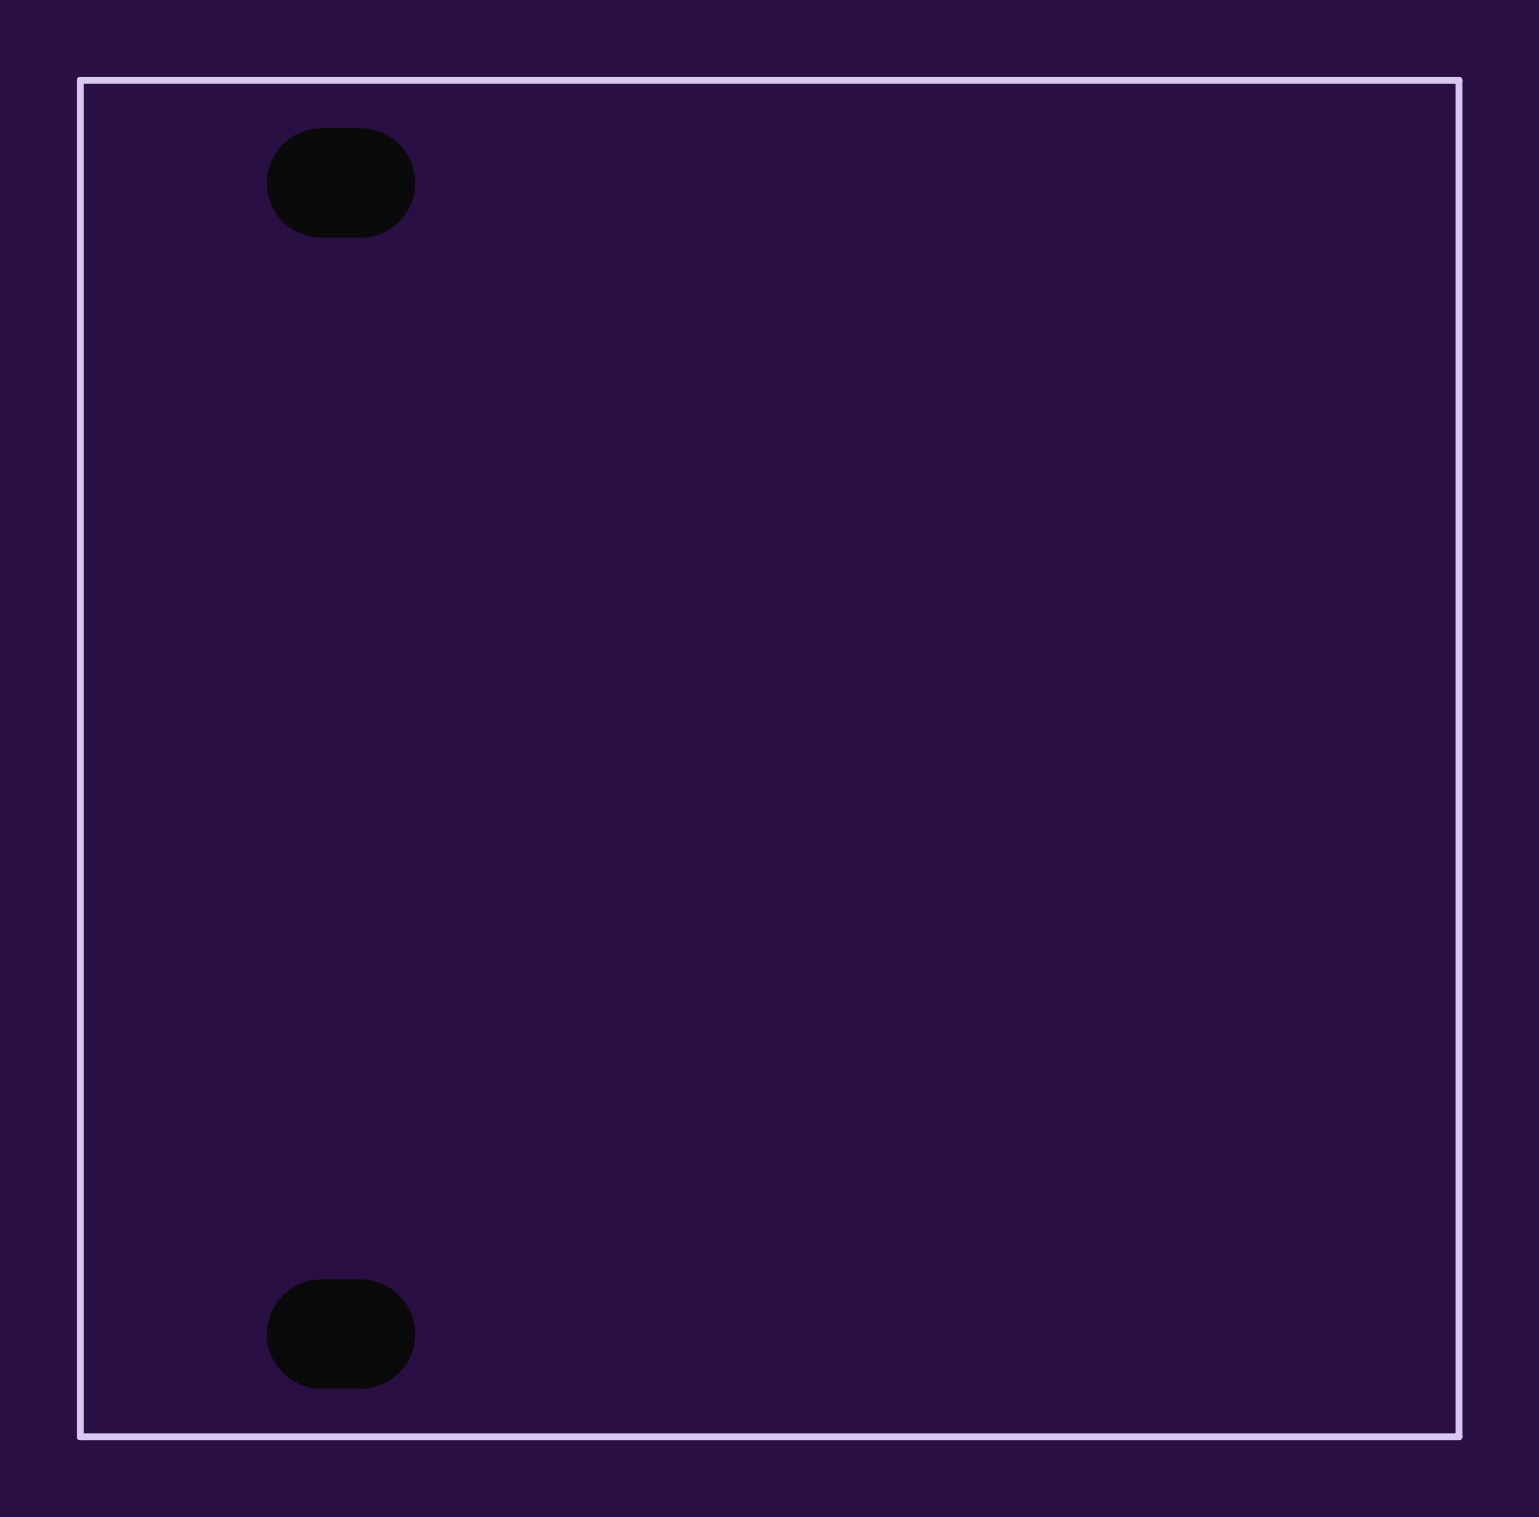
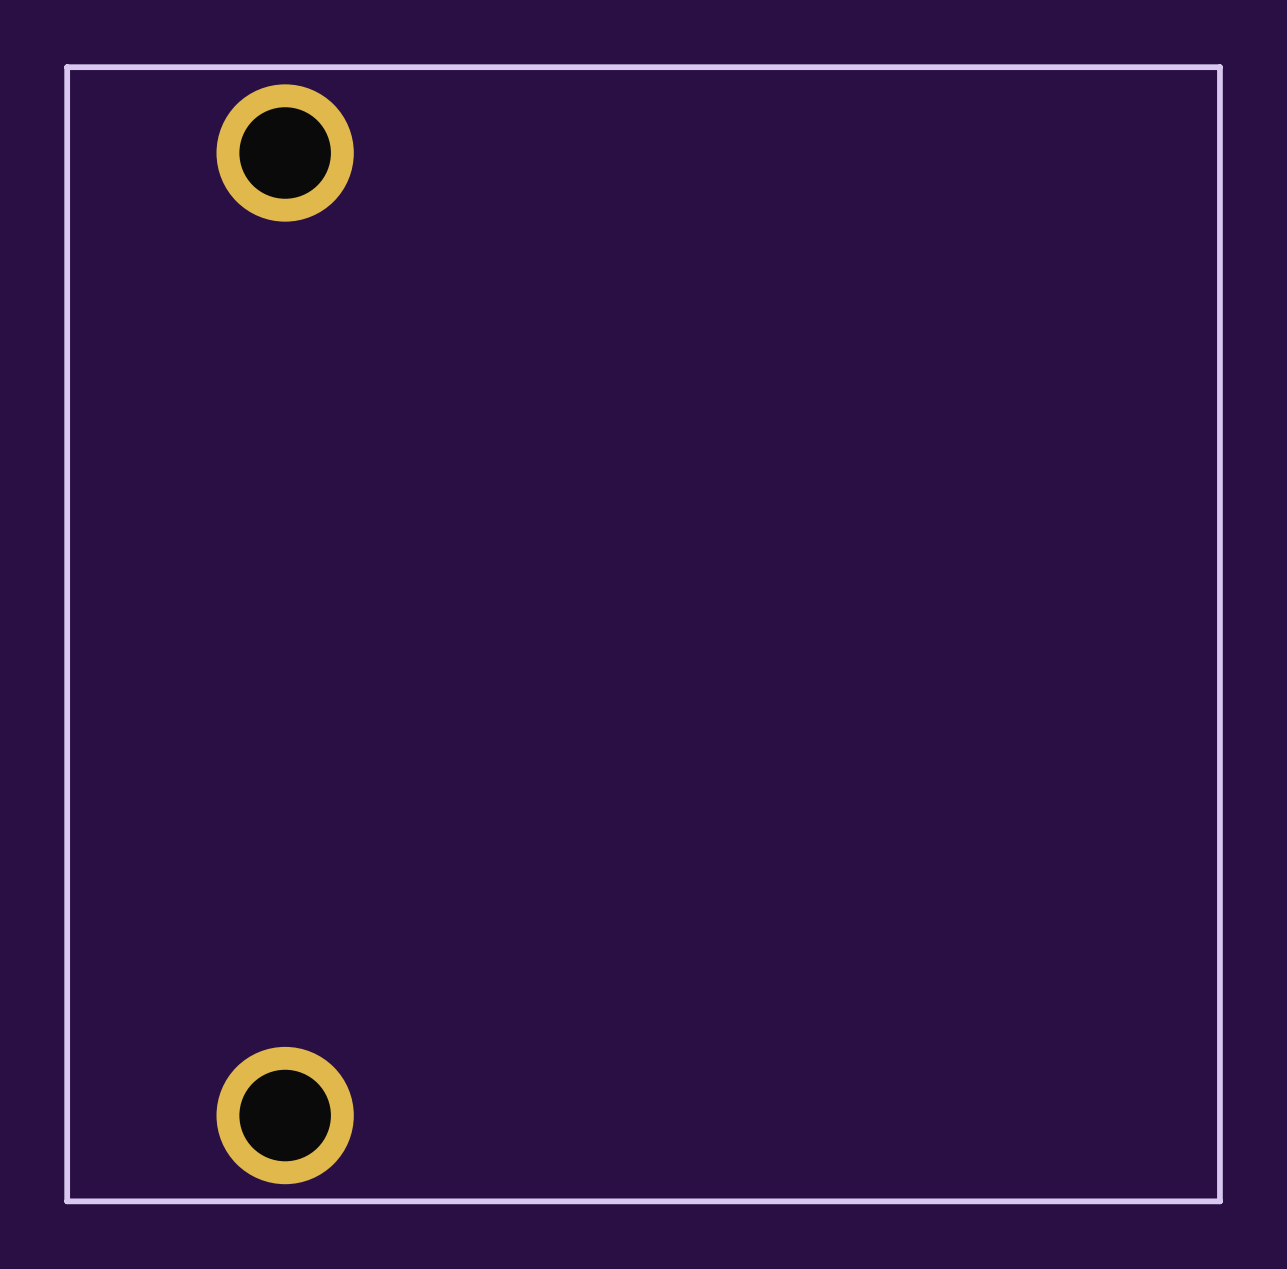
part footprint: [266, 128, 416, 238] -> [216, 84, 354, 222]
part footprint: [266, 1279, 416, 1389] -> [216, 1046, 354, 1185]

